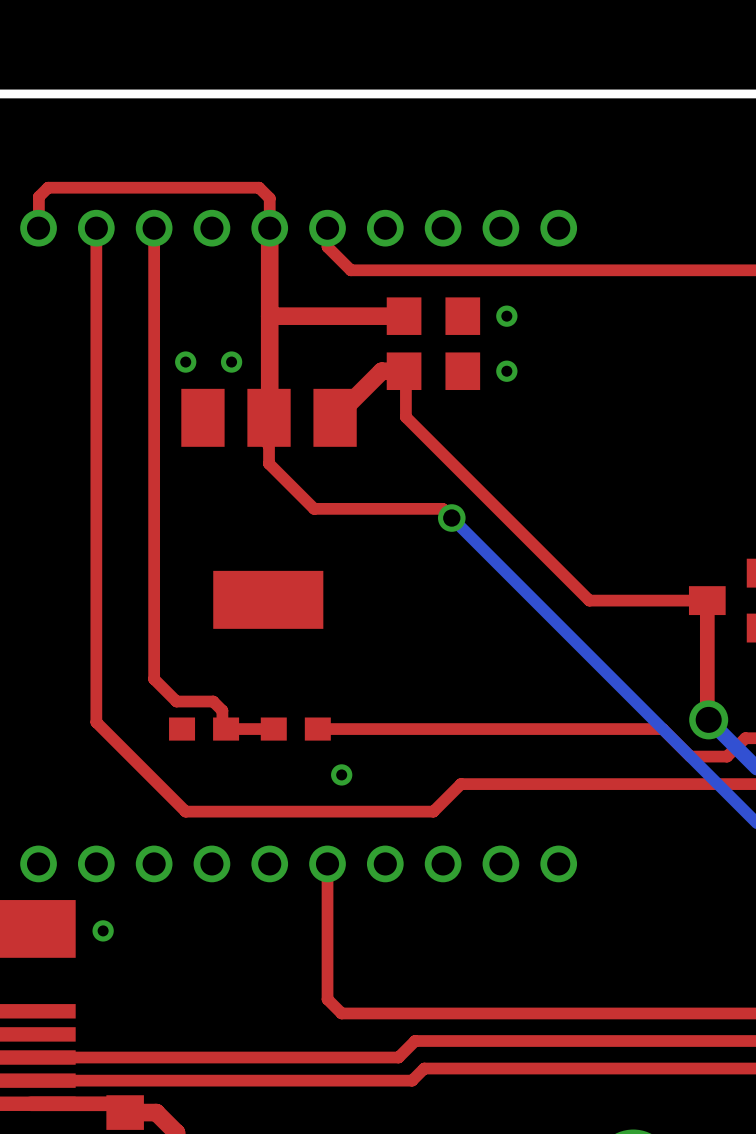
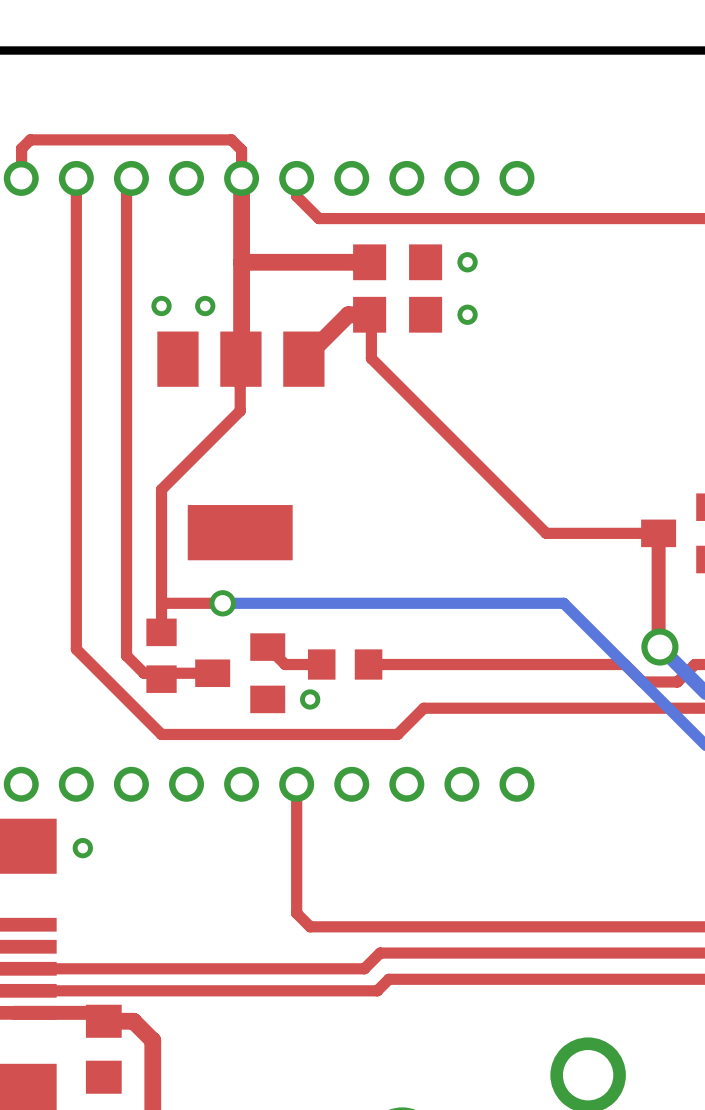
top track: (154, 228) (154, 679) (176, 701) (213, 701) (222, 710) (222, 725) (226, 729) (273, 729) -> (131, 178) (126, 183) (126, 655) (144, 673) (212, 673)
top track: (269, 417) (269, 463) (314, 508) (442, 508) (451, 518) -> none
top track: none -> (240, 384) (240, 410) (161, 489) (161, 632)
bottom track: (451, 518) (607, 674) -> (222, 603) (563, 603)
via: (451, 518) -> none
top track: none -> (222, 603) (161, 603)
via: none -> (222, 603)
part footprint: [169, 717, 240, 741] -> [146, 618, 177, 693]
top track: none -> (267, 647) (285, 664) (321, 664)
part: (295, 729) -> none
top track: (317, 729) (662, 729) (671, 738) -> (368, 664) (624, 664)
part: none -> (345, 664)
part: none -> (240, 673)

